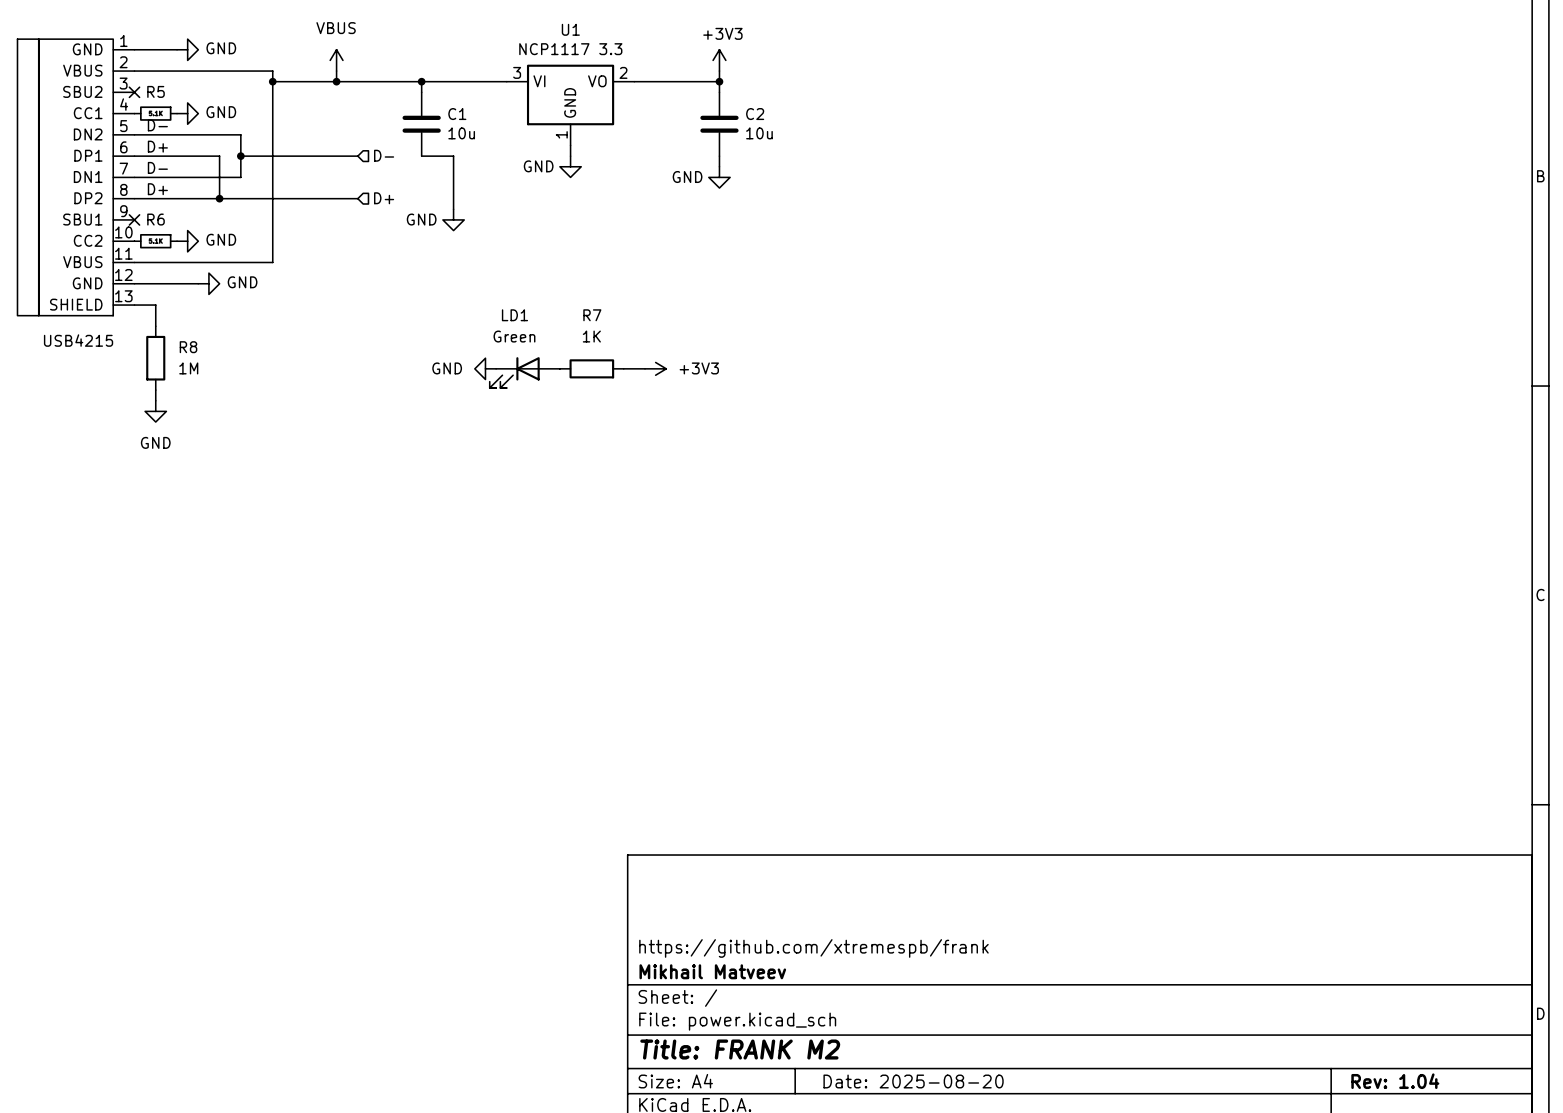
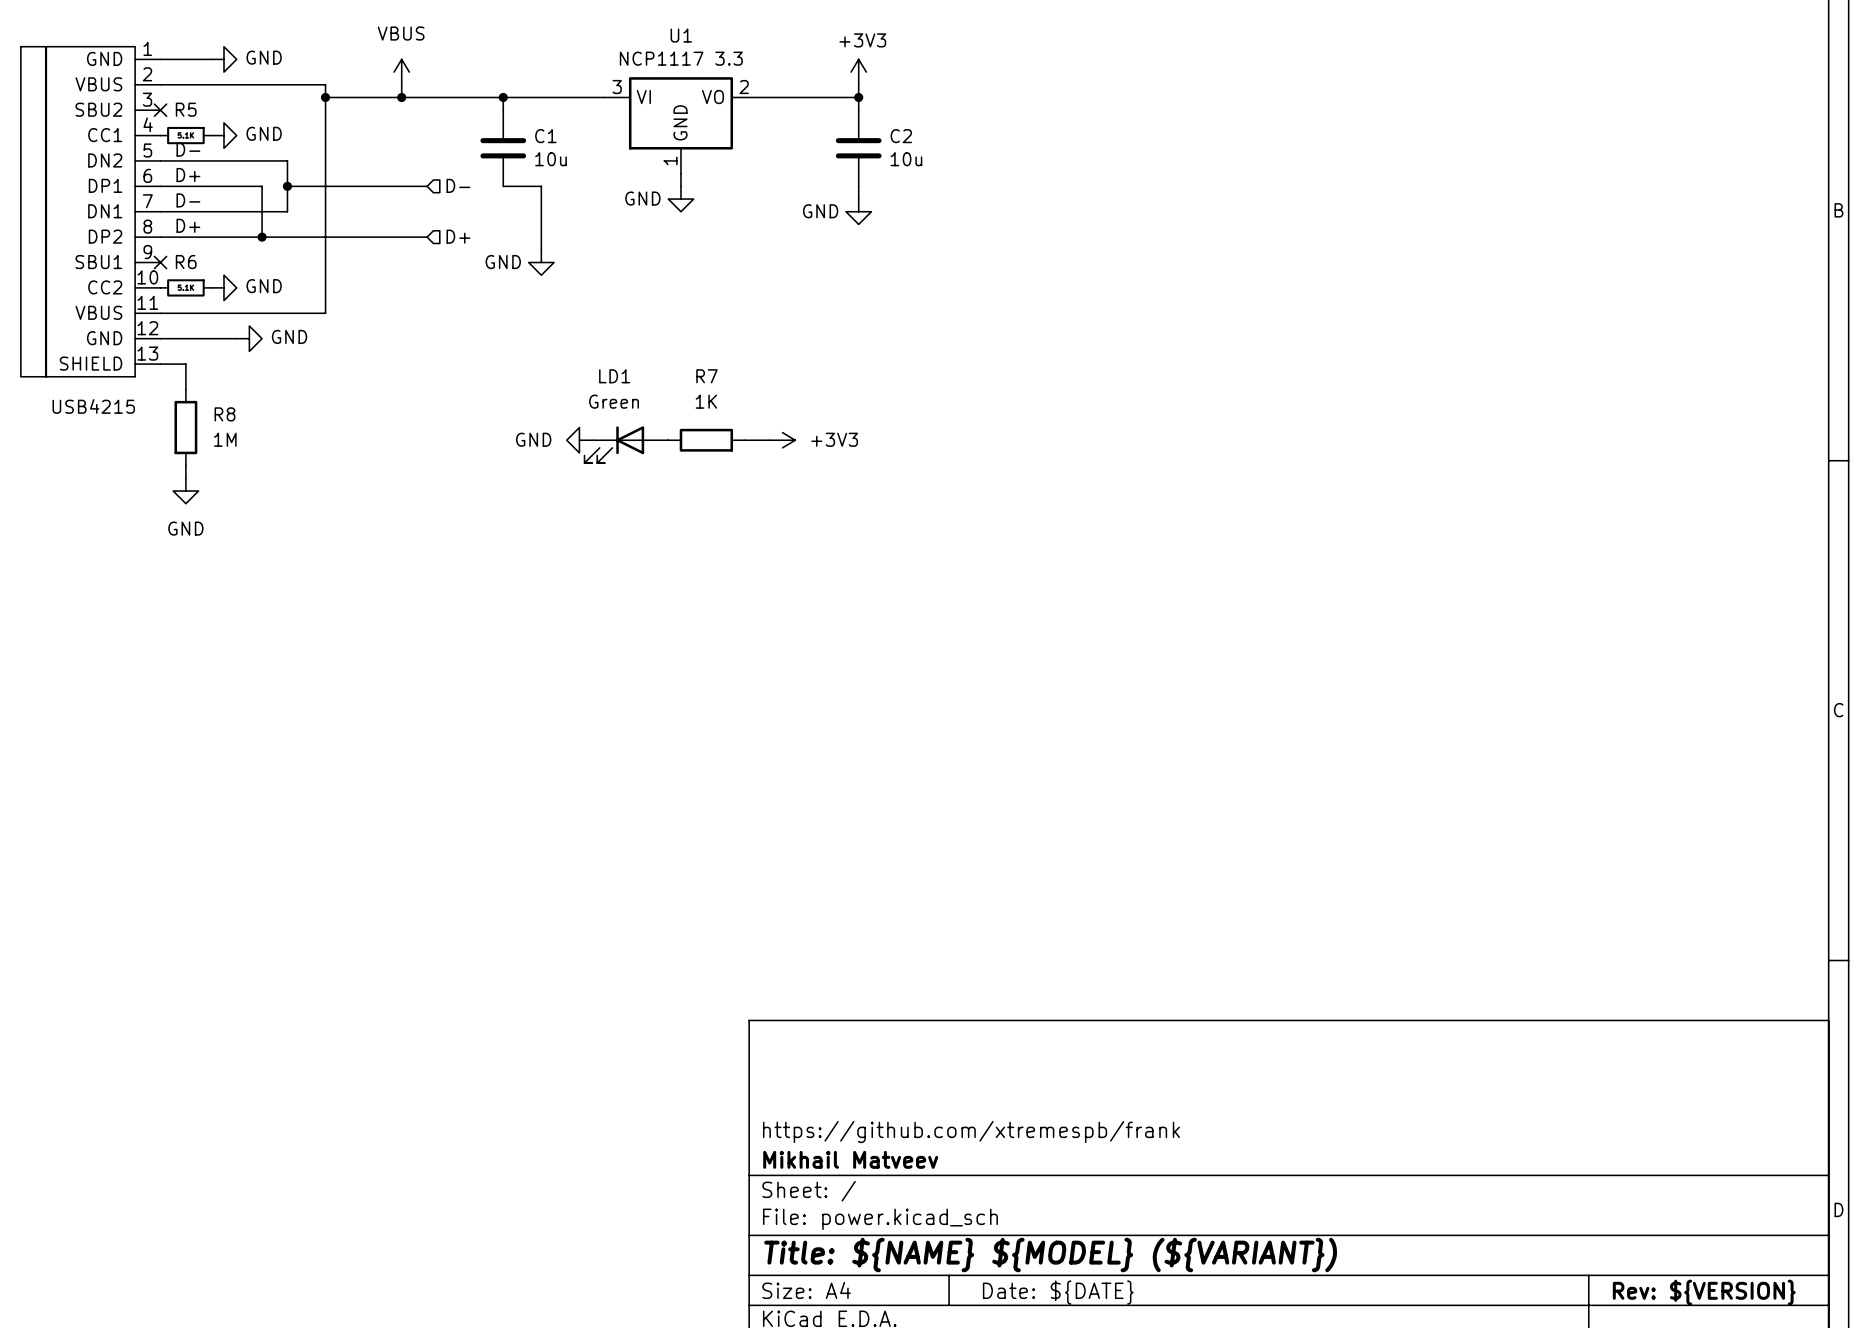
title block: Title: FRANK M2 (740, 1049) -> Title: ${NAME} ${MODEL} (${VARIANT}) (1050, 1255)
title block: Date: 2025-08-20 (913, 1081) -> Date: ${DATE} (1058, 1292)
title block: Rev: 1.04 (1395, 1081) -> Rev: ${VERSION} (1704, 1292)

